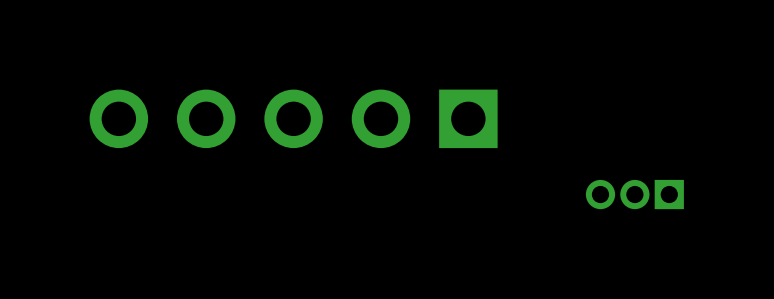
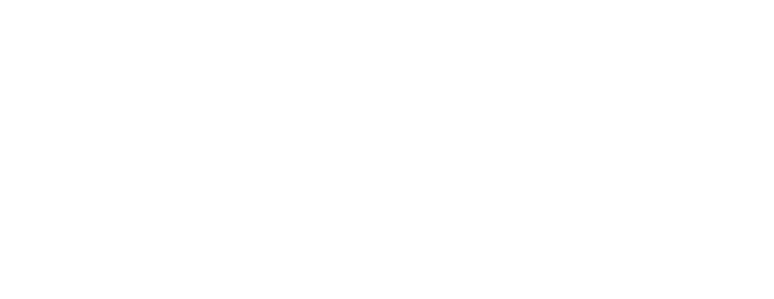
part: (293, 118) -> none
part: (634, 194) -> none

